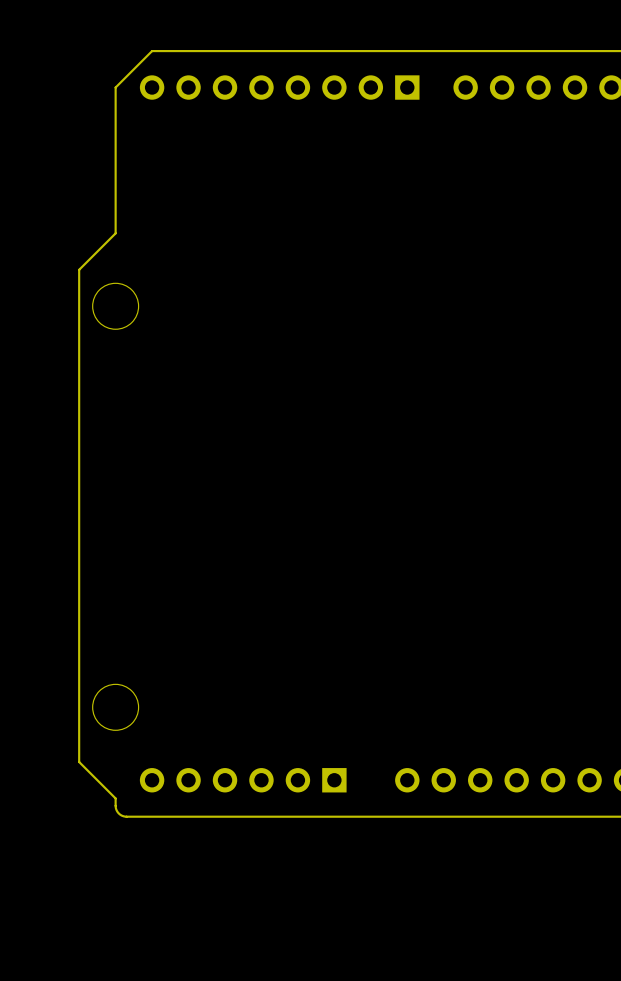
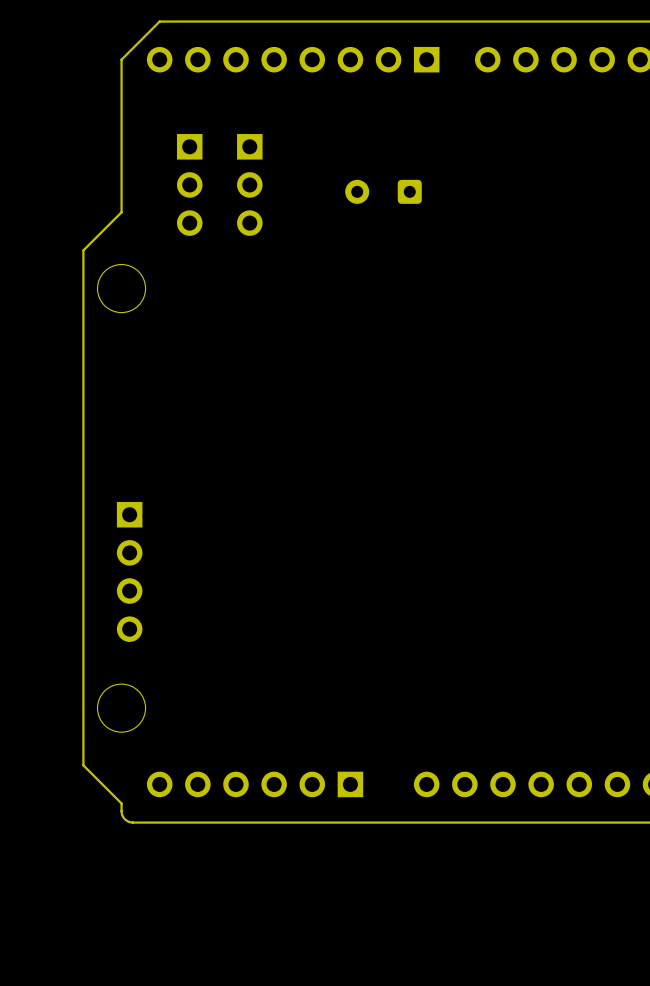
part: none -> (189, 184)
part: none -> (249, 184)
part: none -> (383, 191)
part: none -> (129, 571)

